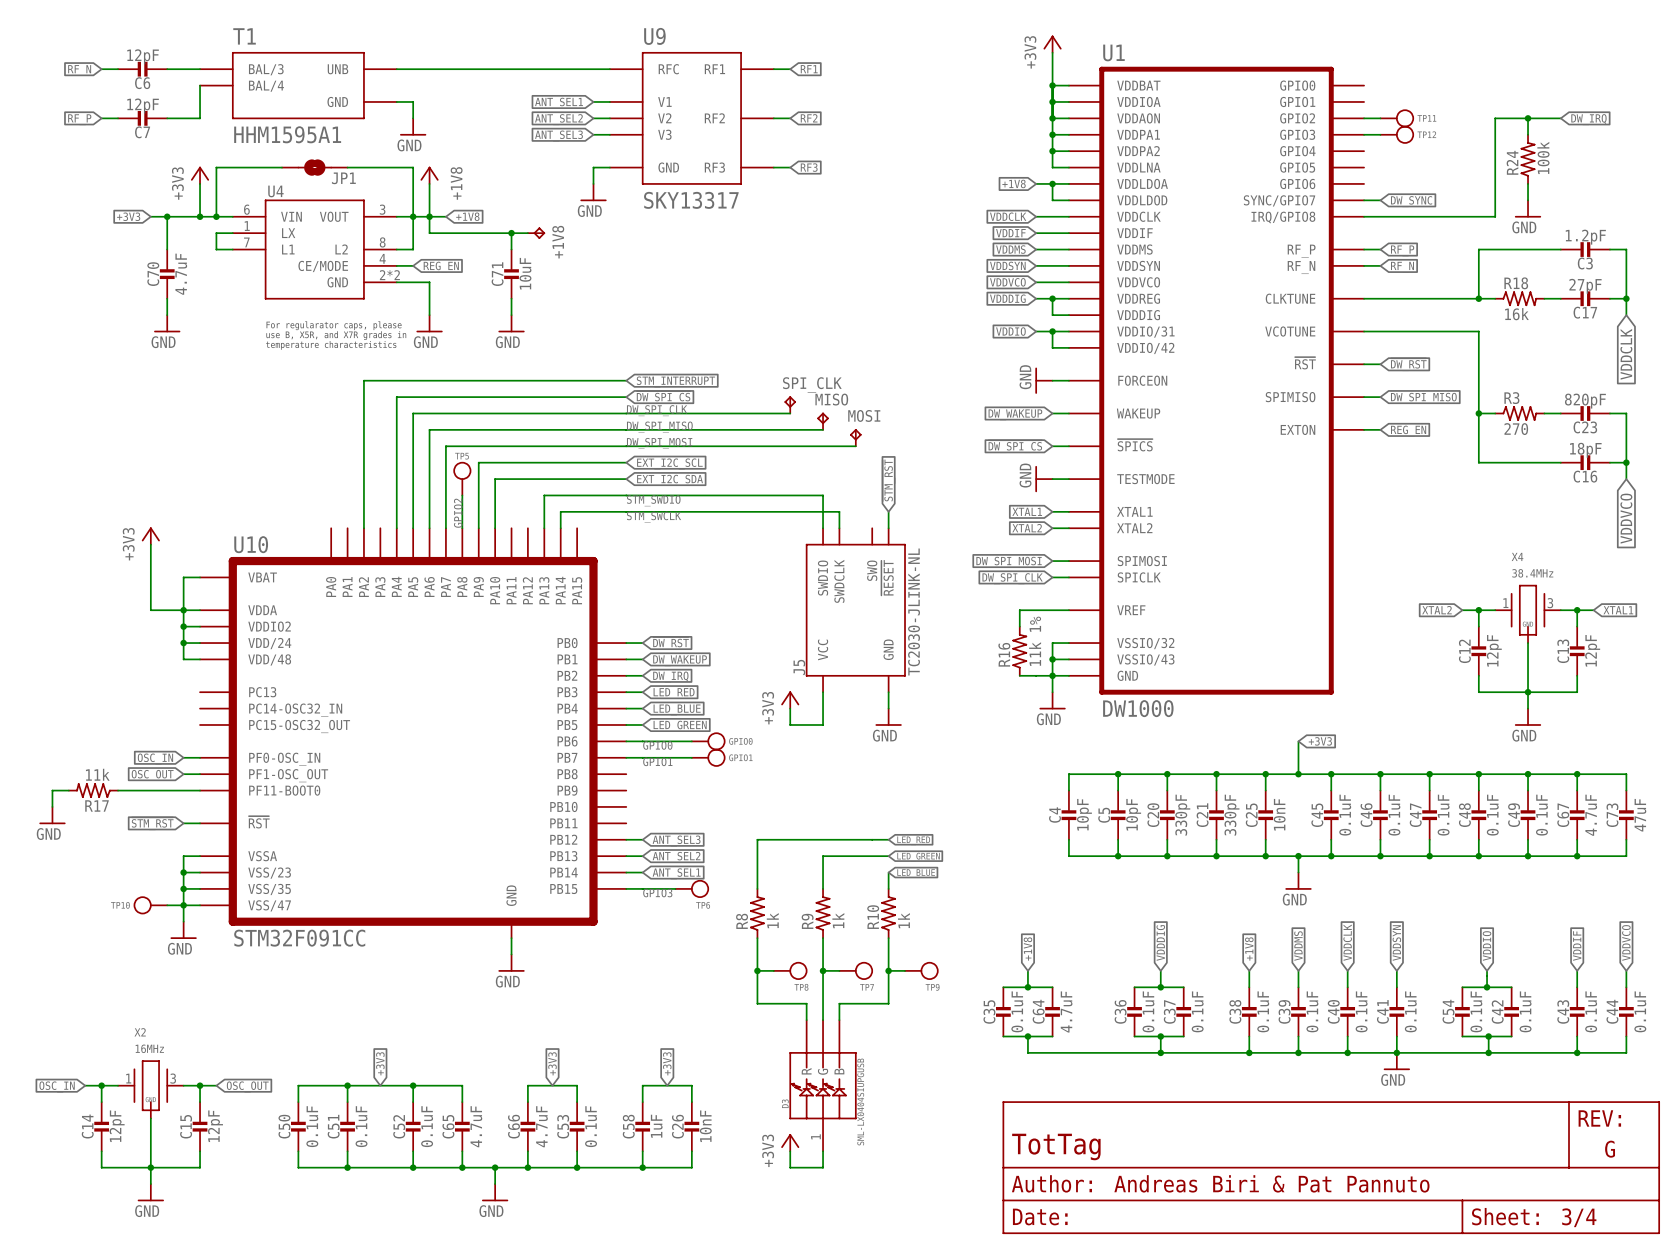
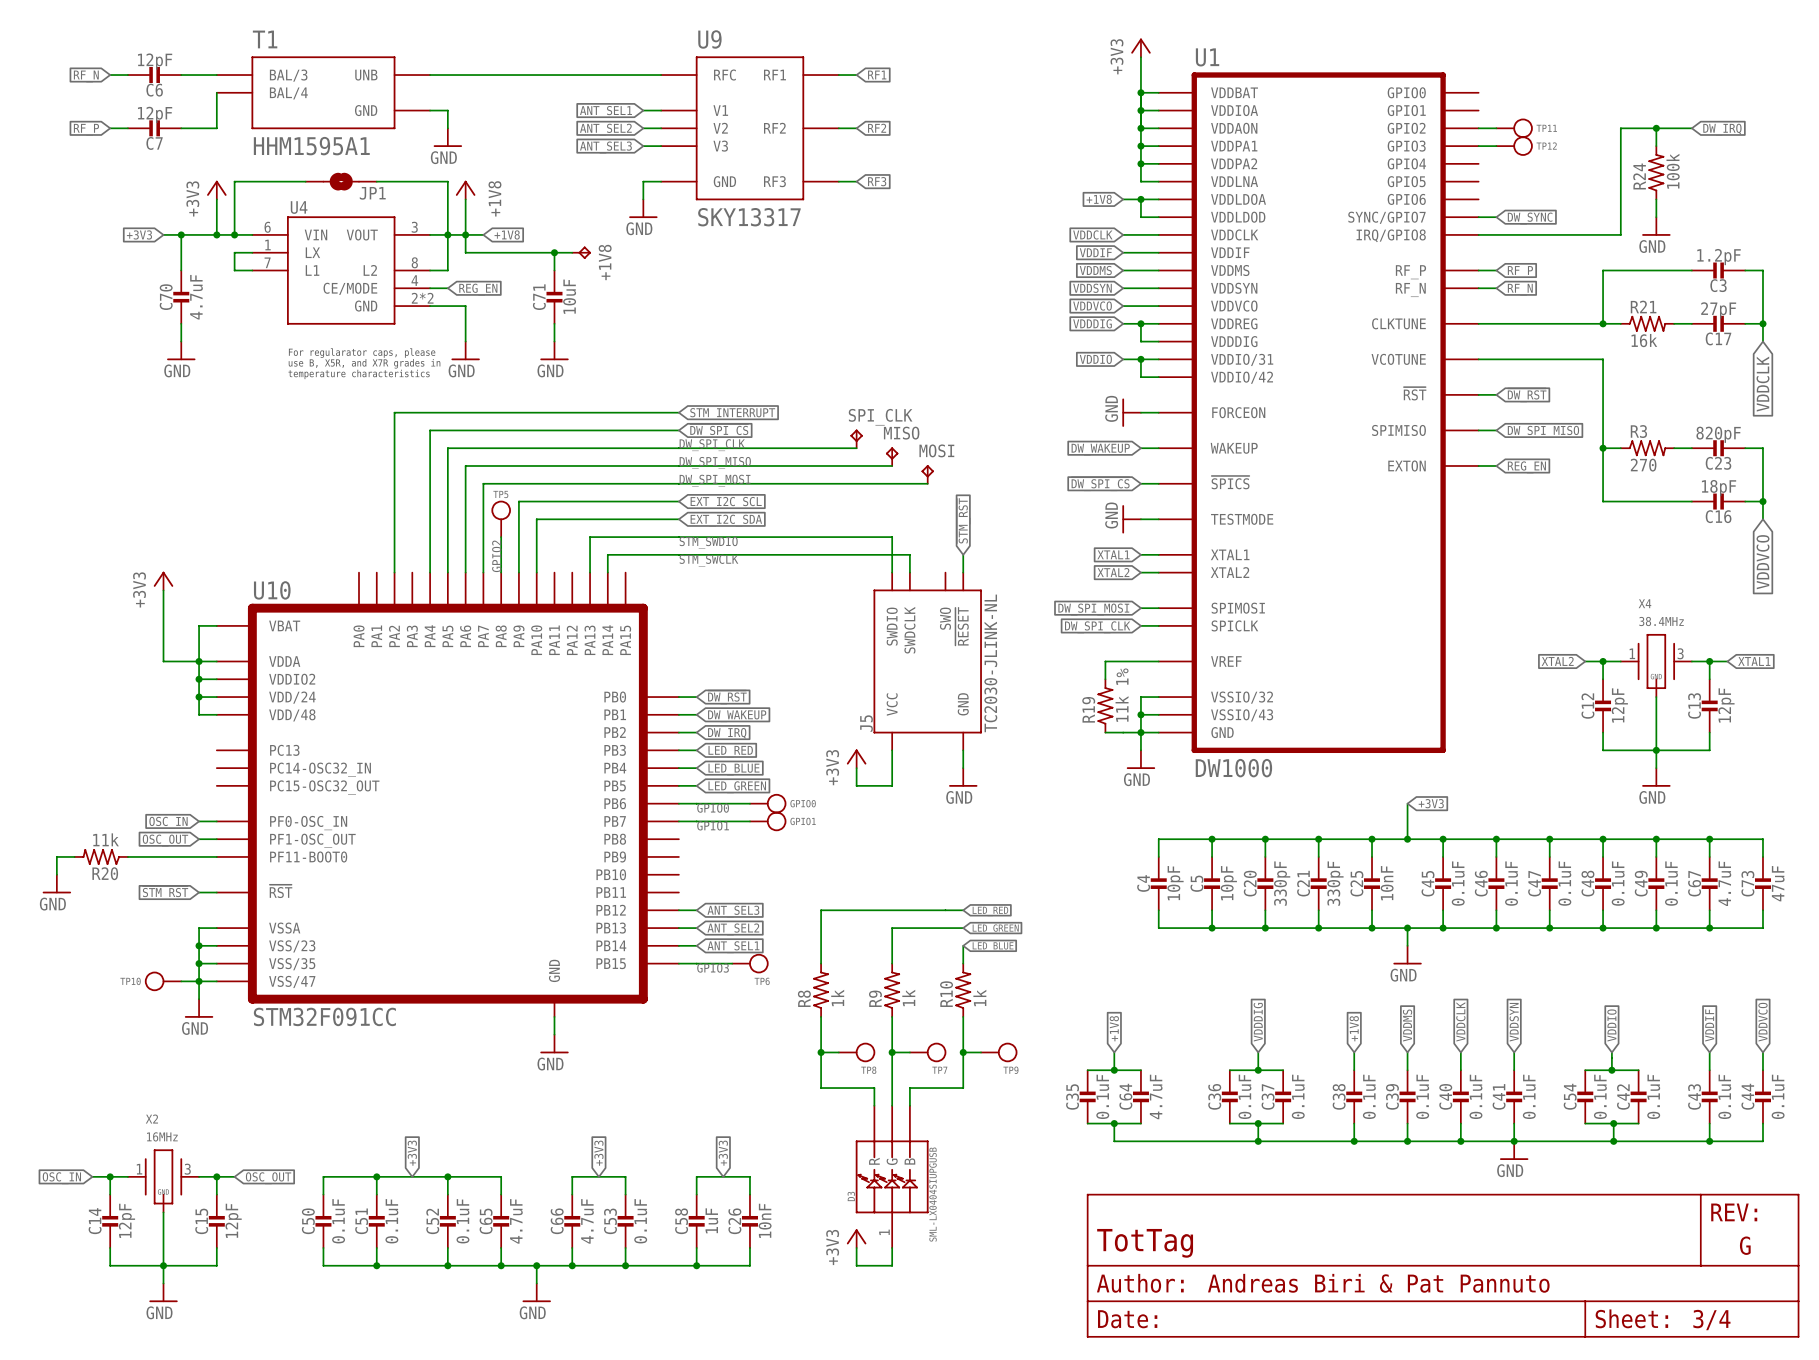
R18 name: R18 (1516, 283) -> R21 (1643, 307)
R16 name: R16 (1004, 654) -> R19 (1088, 709)
R17 name: R17 (97, 805) -> R20 (105, 873)

